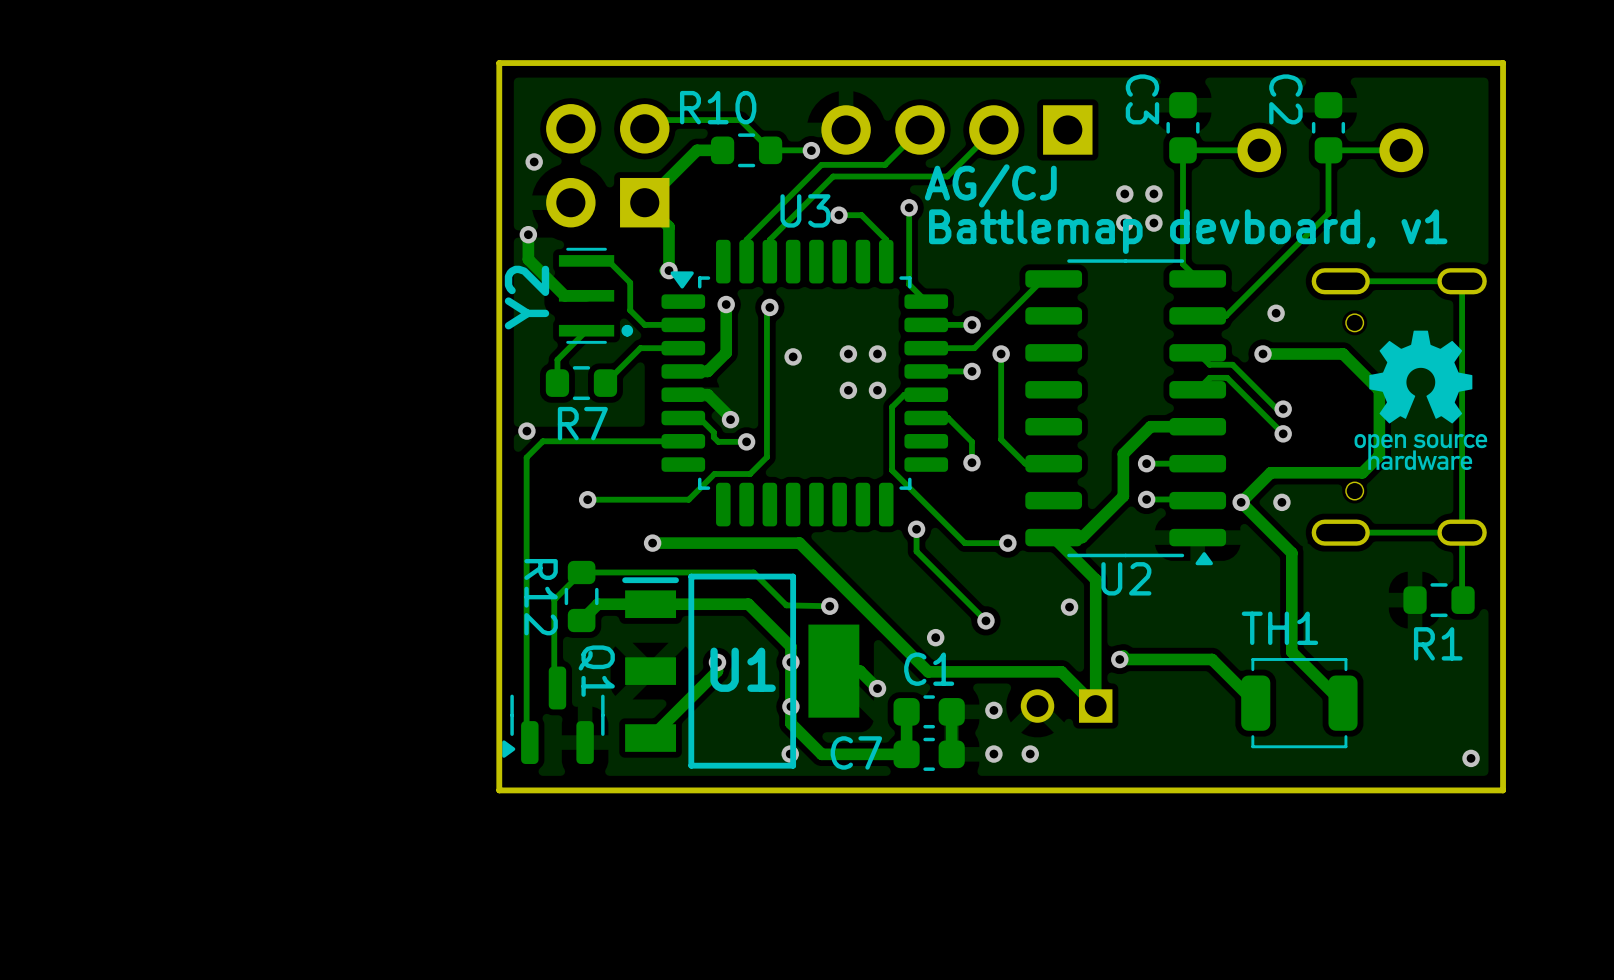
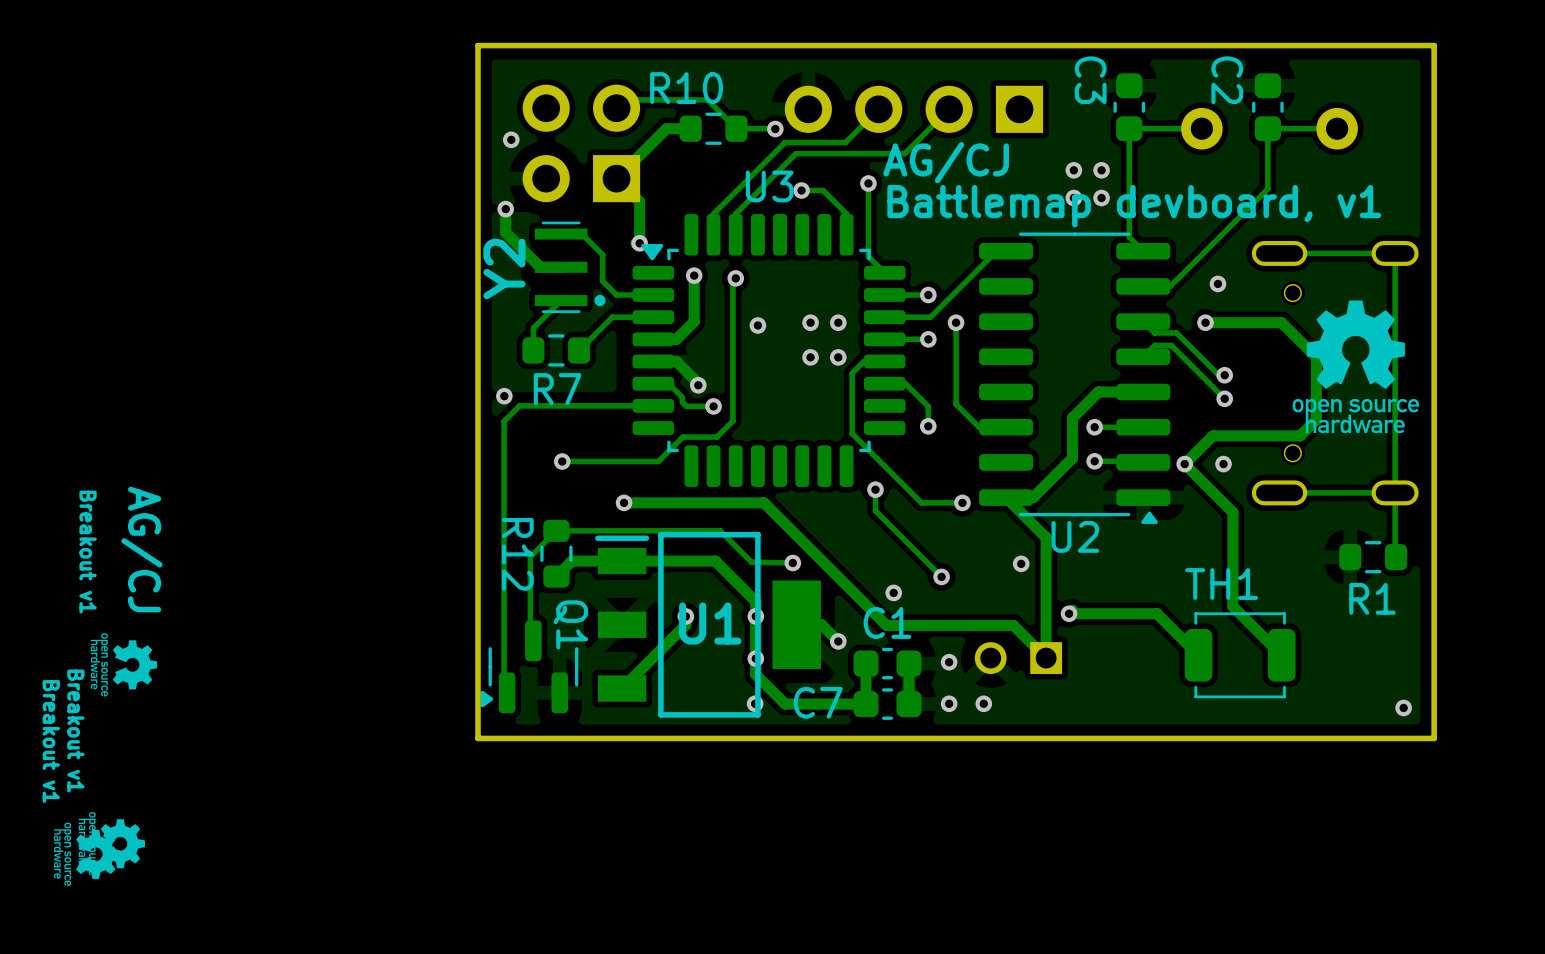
text: none -> AG/CJ (141, 549)
text: none -> Breakout v1 (88, 552)
drawing: none -> [90, 633, 158, 697]
text: none -> Breakout v1 (75, 730)
text: none -> Breakout v1 (51, 741)
drawing: none -> [53, 812, 145, 886]

